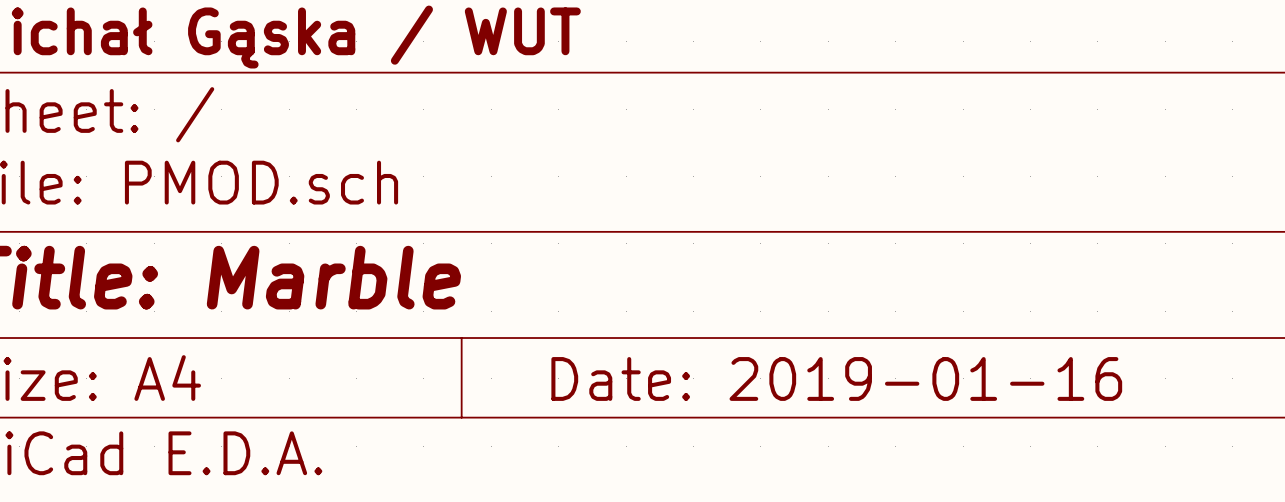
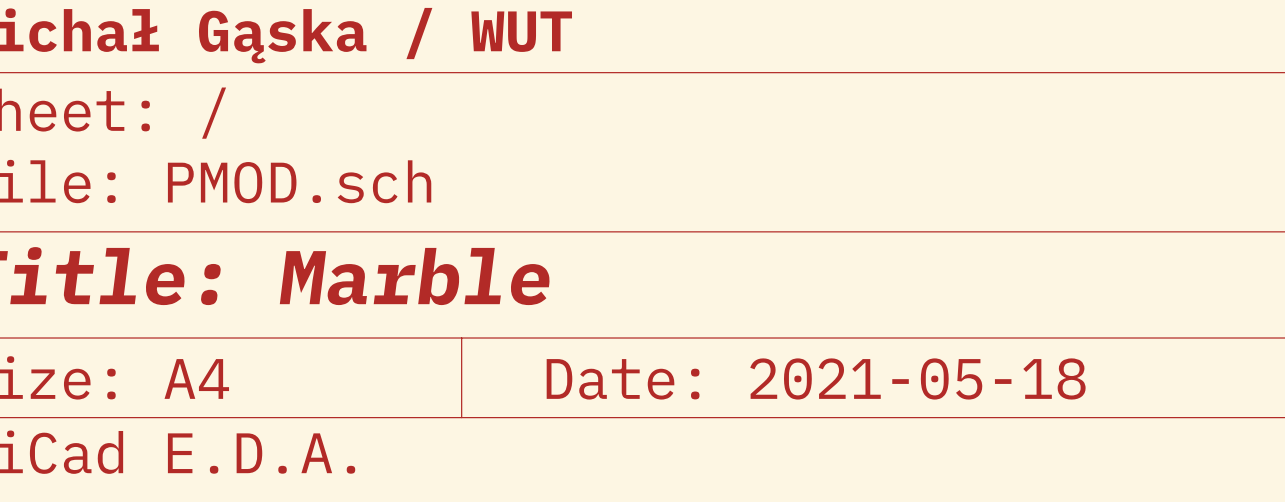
title block: Date: 2019-01-16 (836, 378) -> Date: 2021-05-18 (816, 378)

